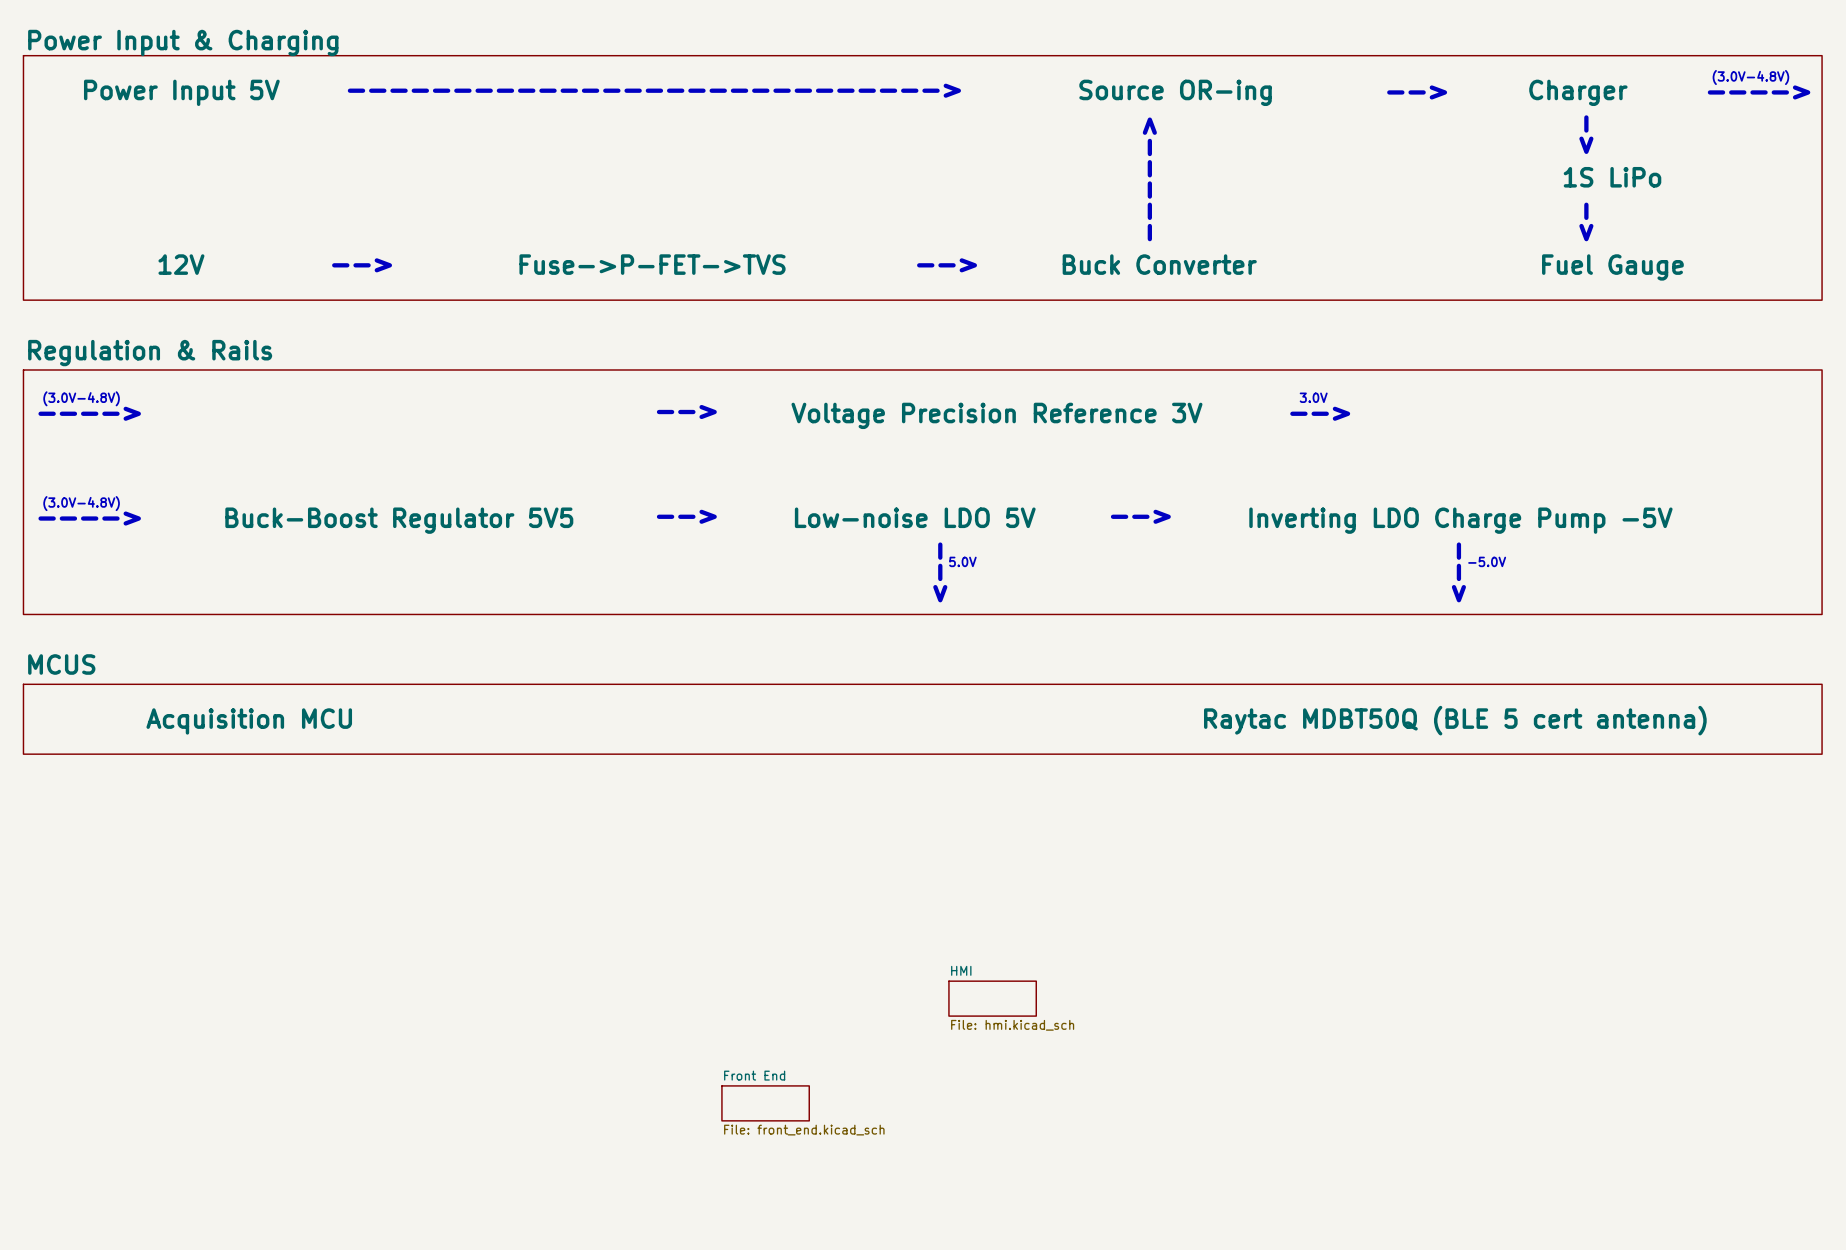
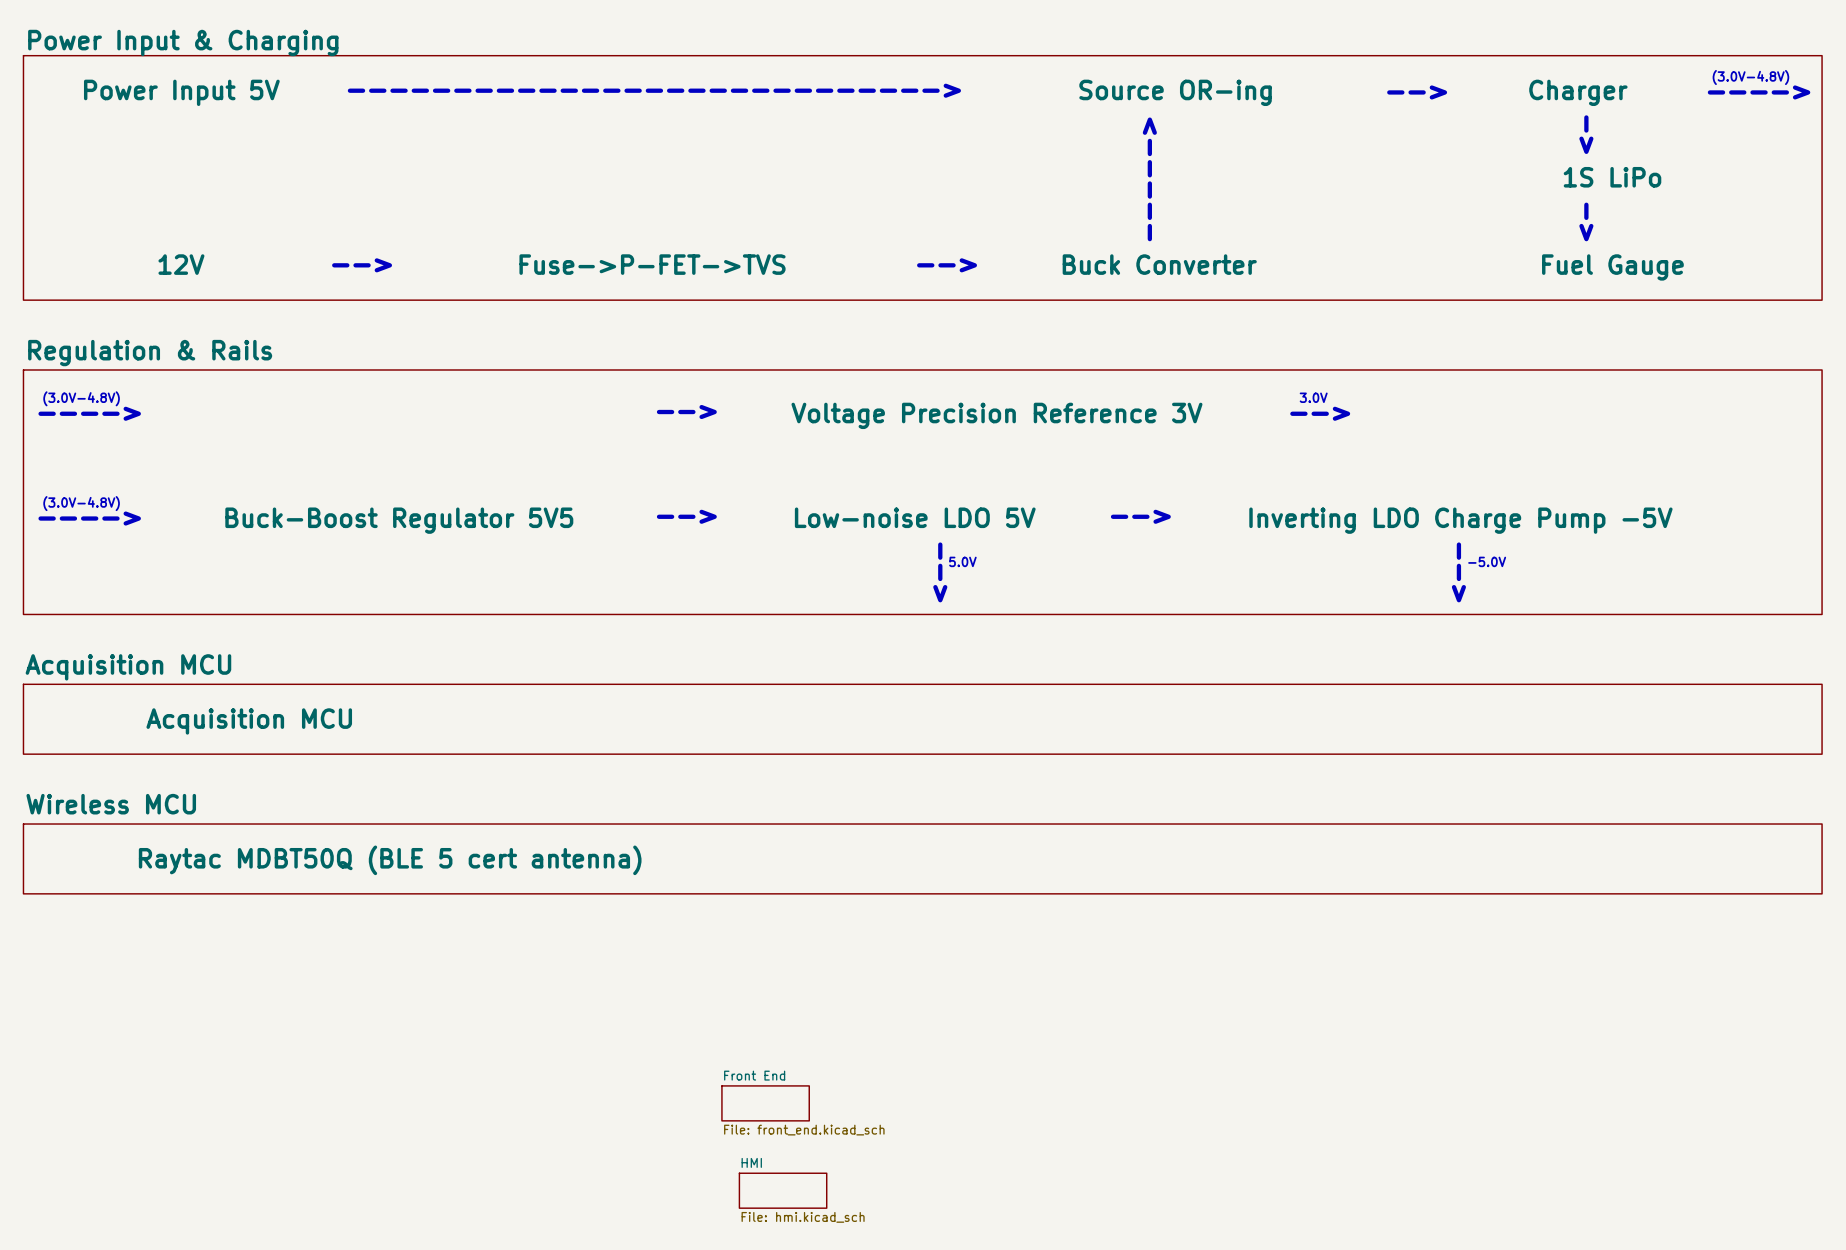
sheet MCUS name: MCUS (61, 664) -> Acquisition MCU (128, 667)
sheet MCUS text: Raytac MDBT50Q (BLE 5 cert antenna) (1455, 720) -> none
sheet Wireless MCU: none -> (922, 858)
sheet HMI: File: hmi.kicad_sch (992, 998) -> none
sheet HMI: none -> File: hmi.kicad_sch (783, 1190)

